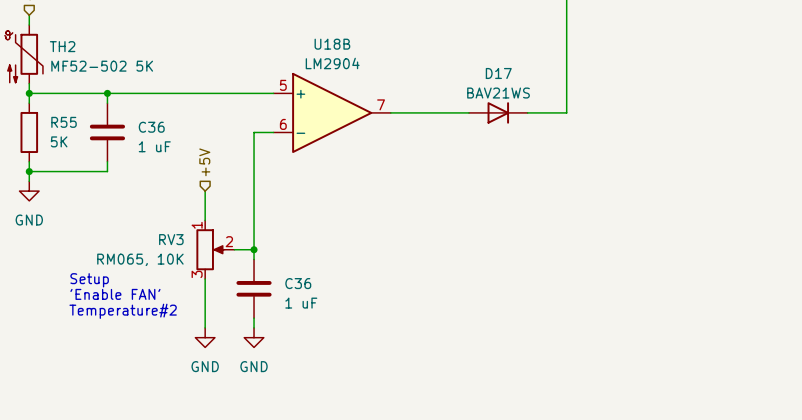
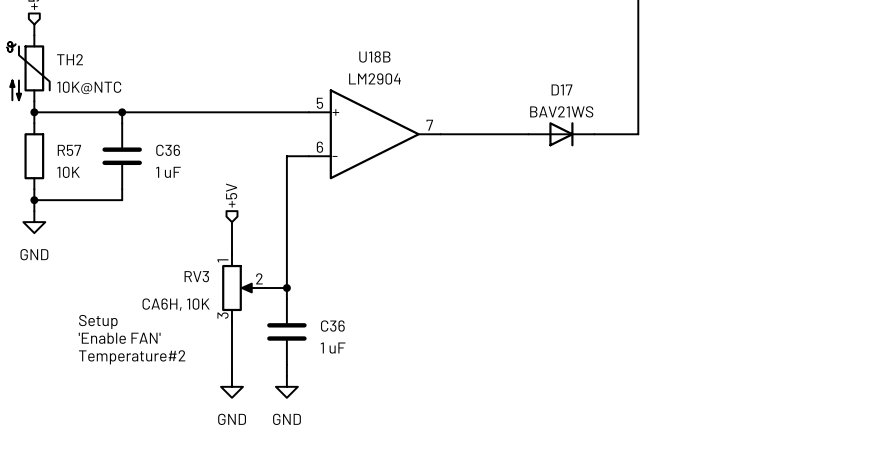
TH2 value: MF52-502 5K (102, 66) -> 10K@NTC (89, 87)
R55 name: R55 (64, 122) -> R57 (69, 150)
R55 value: 5K (59, 141) -> 10K (68, 172)
RV3 value: RM065, 10K (140, 259) -> CA6H, 10K (176, 304)

